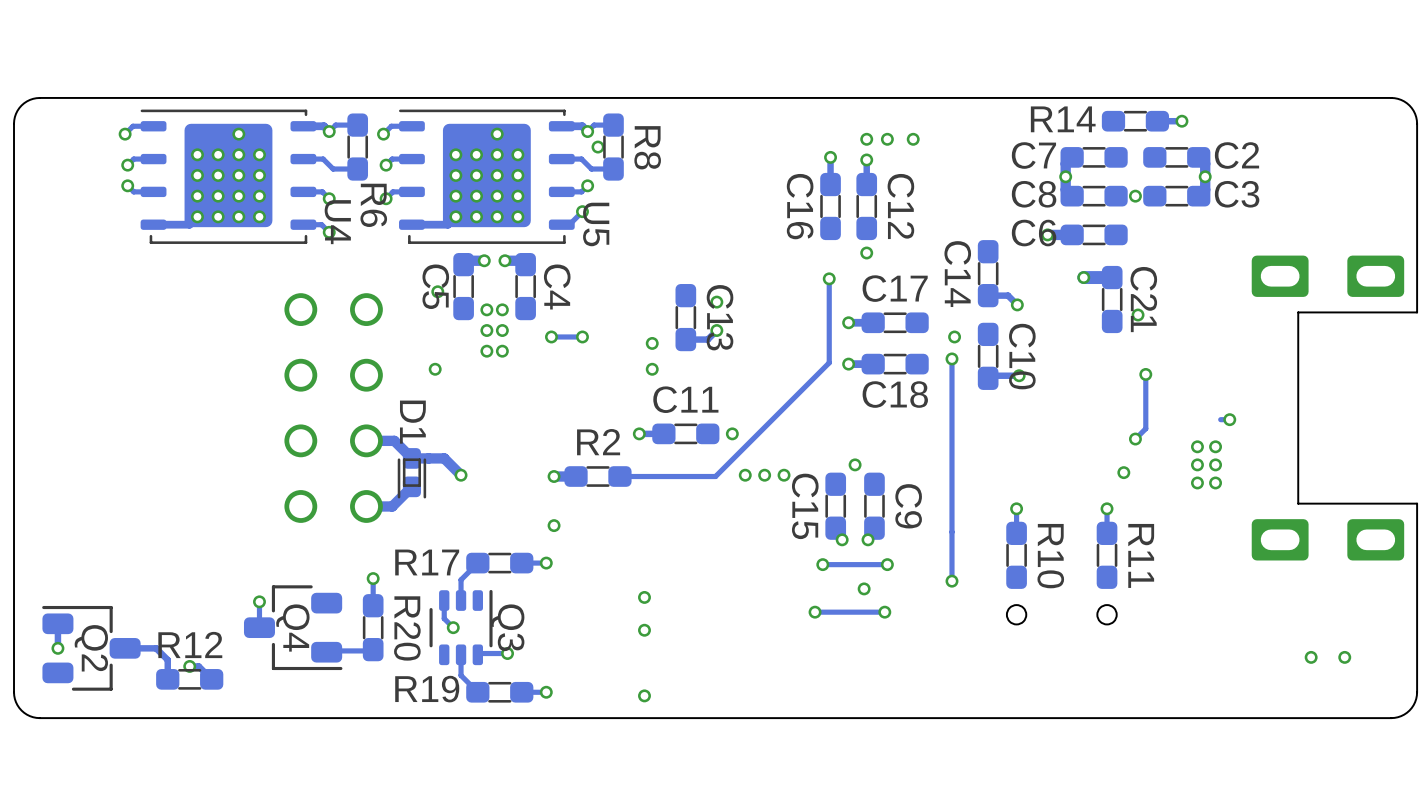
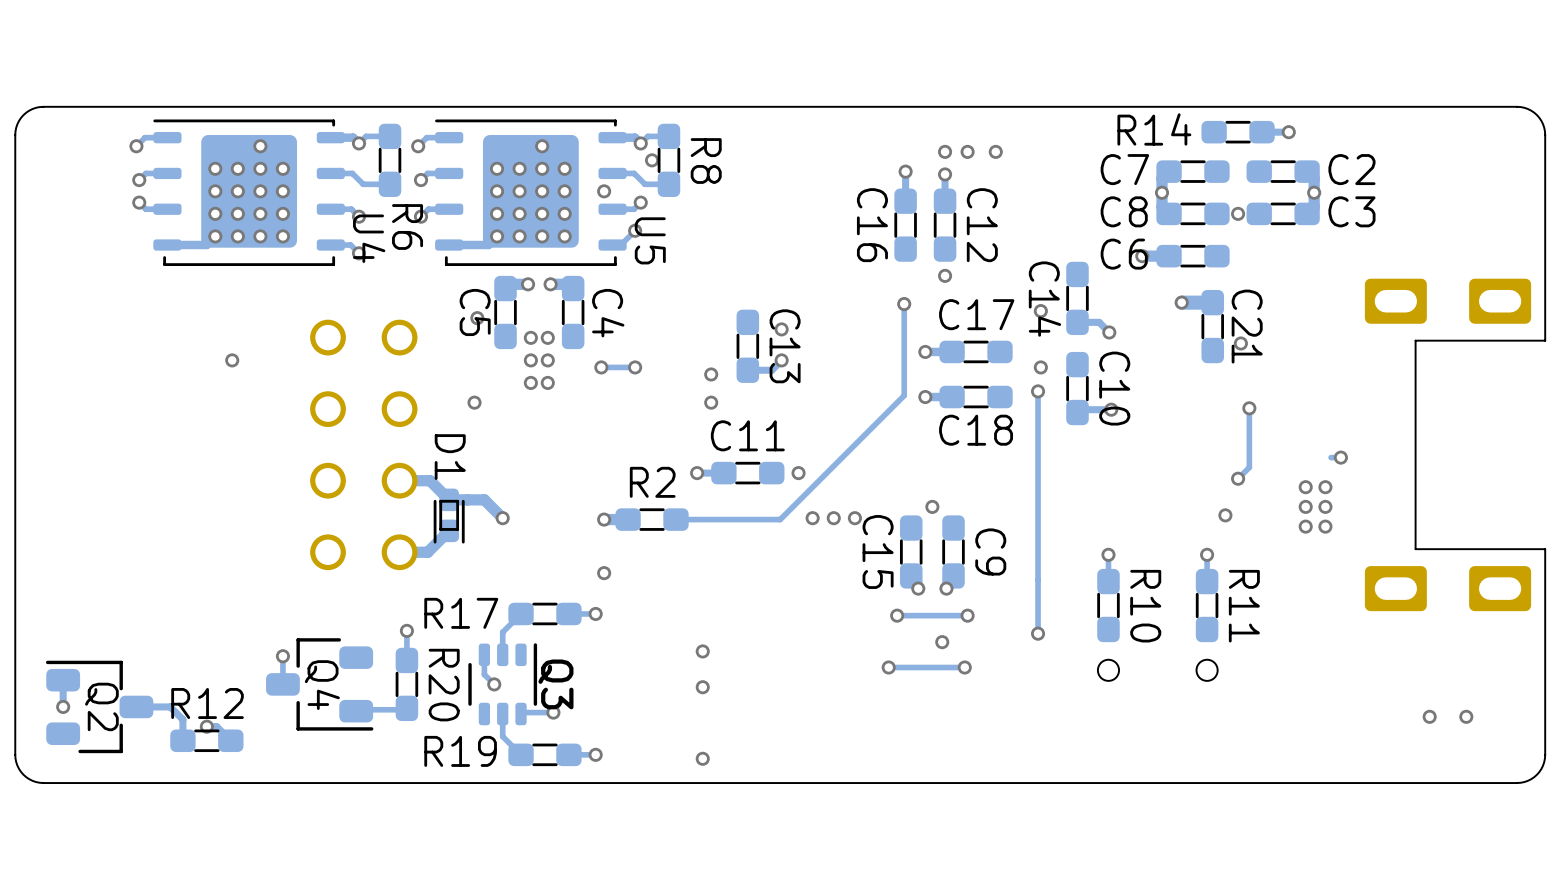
via: none -> (604, 191)
via: none -> (1040, 311)
via: none -> (232, 360)

